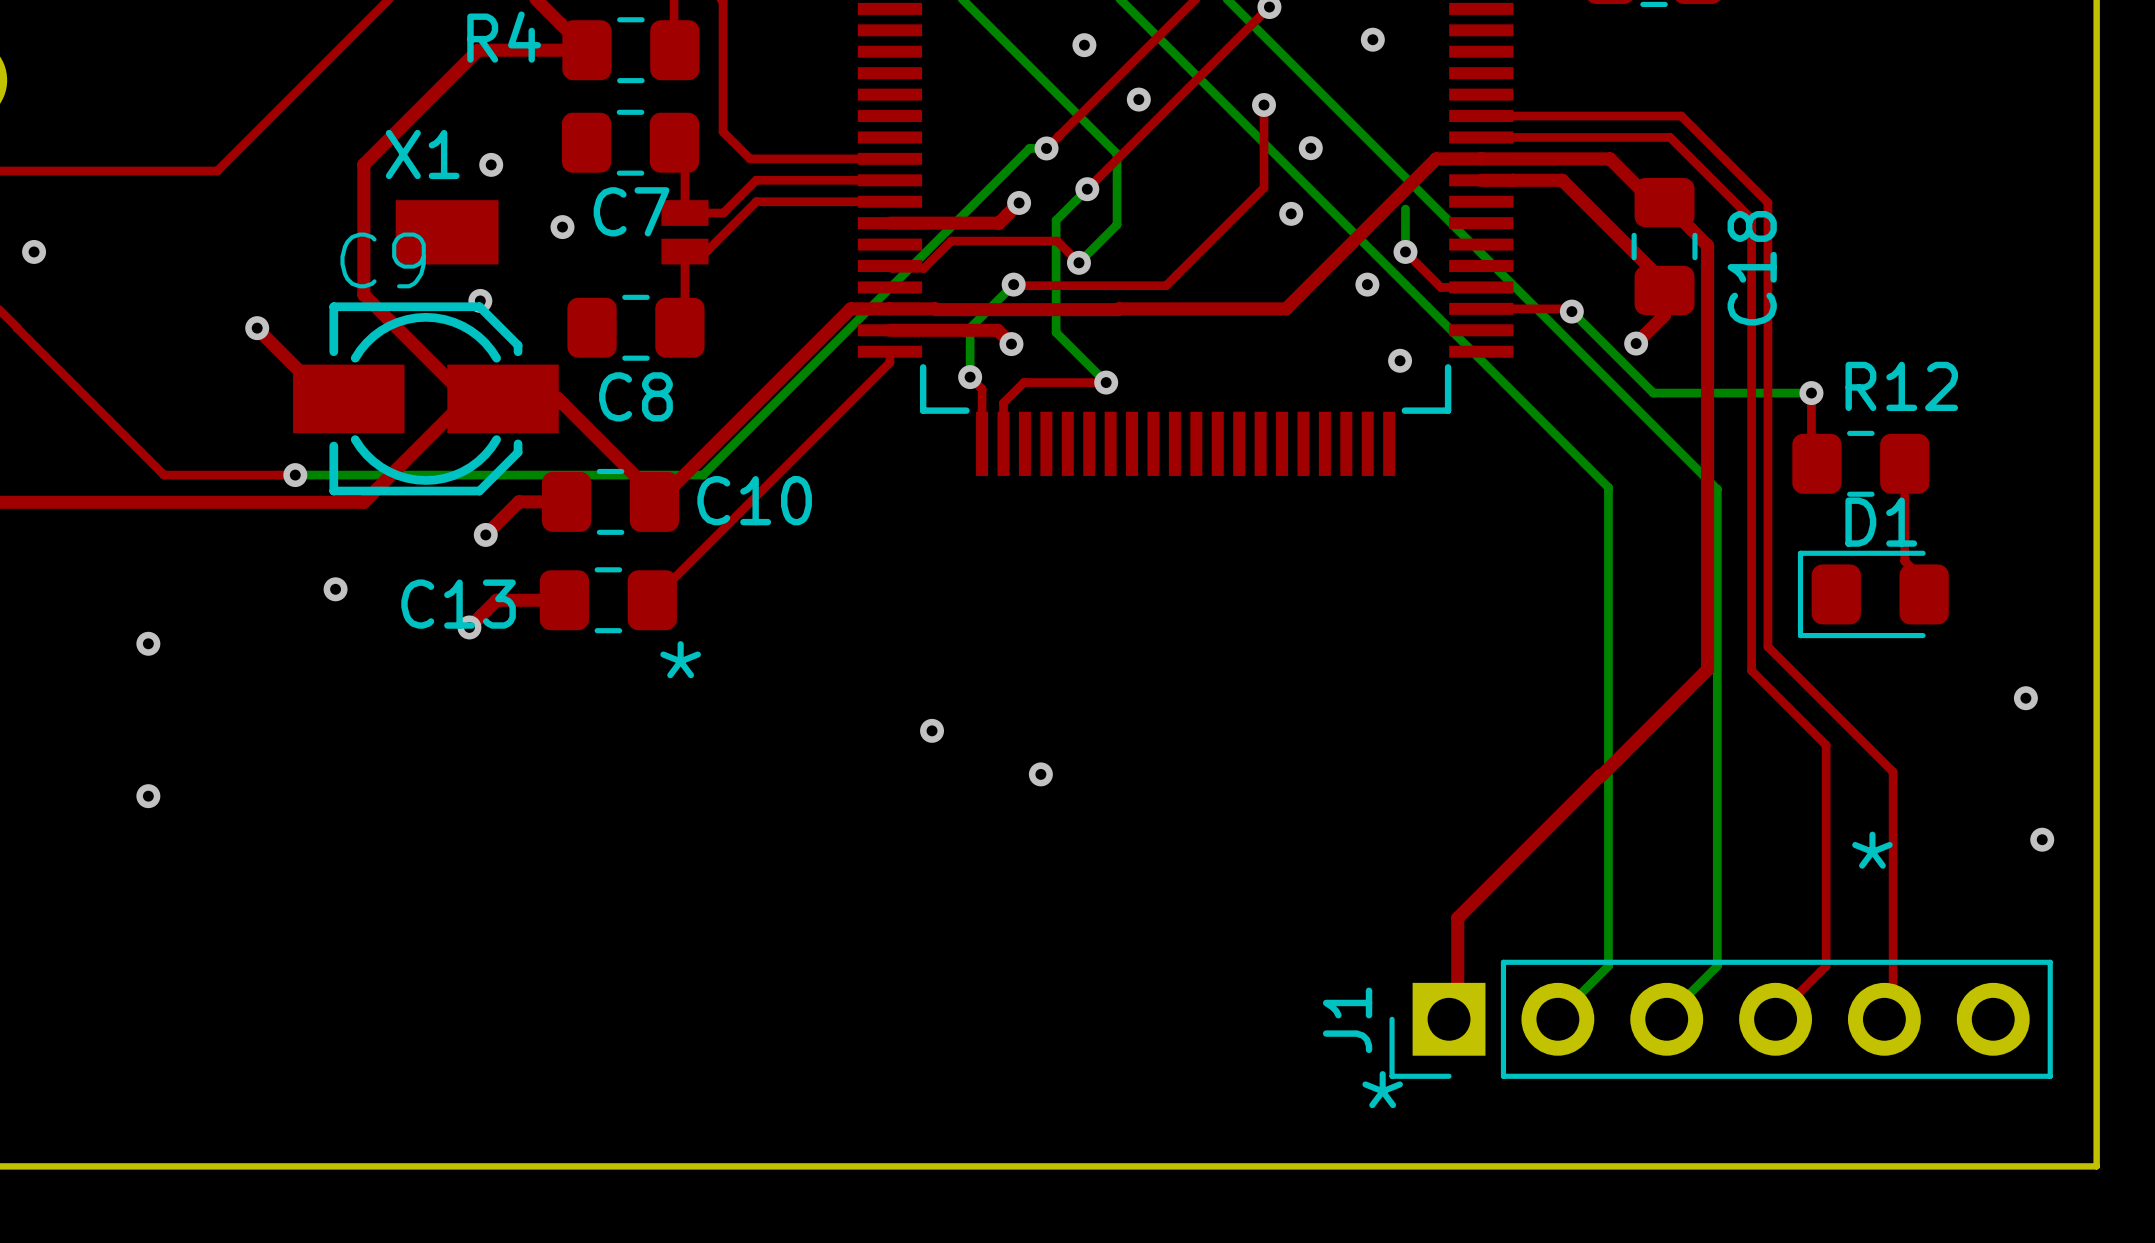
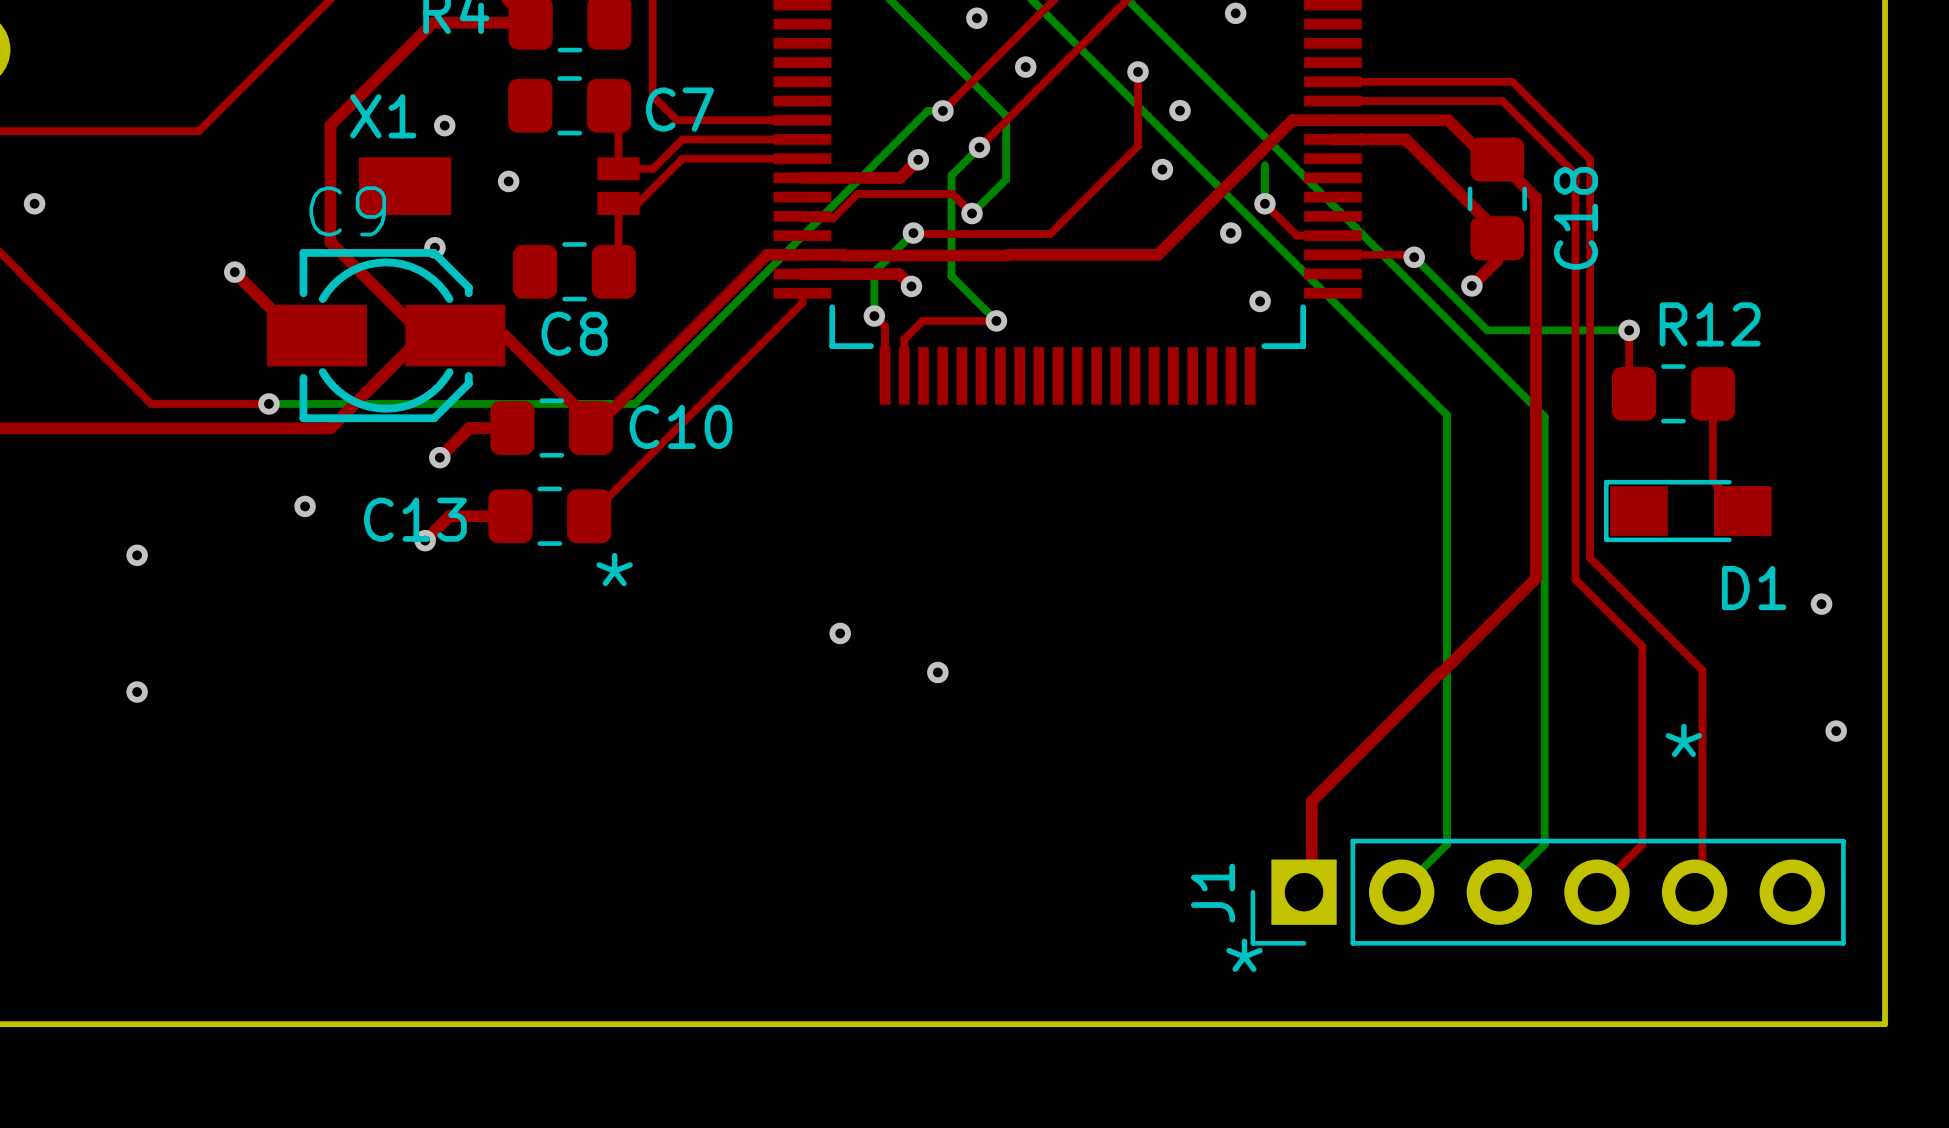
C7 name position: C7 (631, 211) -> C7 (679, 109)
D1 name position: D1 (1881, 522) -> D1 (1754, 588)
D1 footprint: [1797, 550, 1949, 639] -> [1603, 479, 1772, 543]

